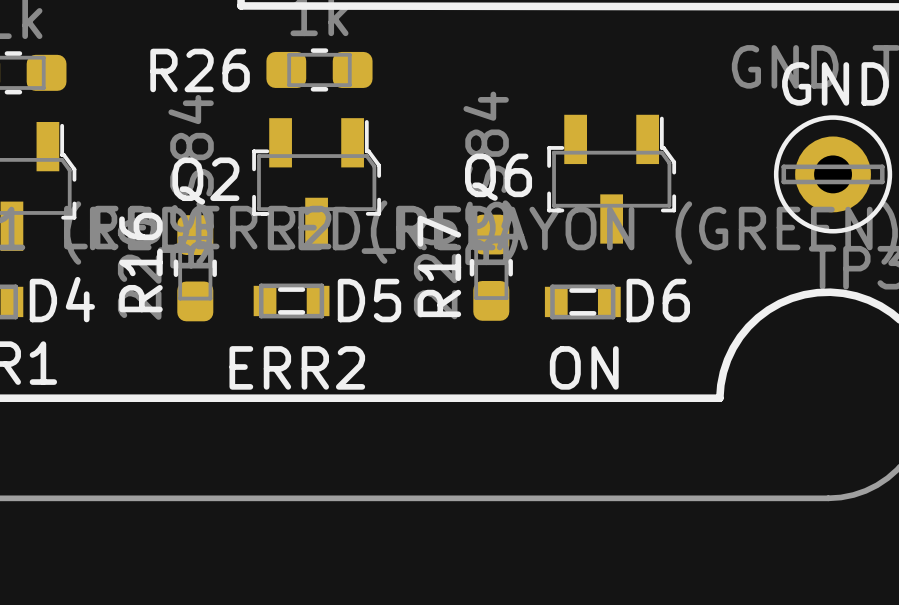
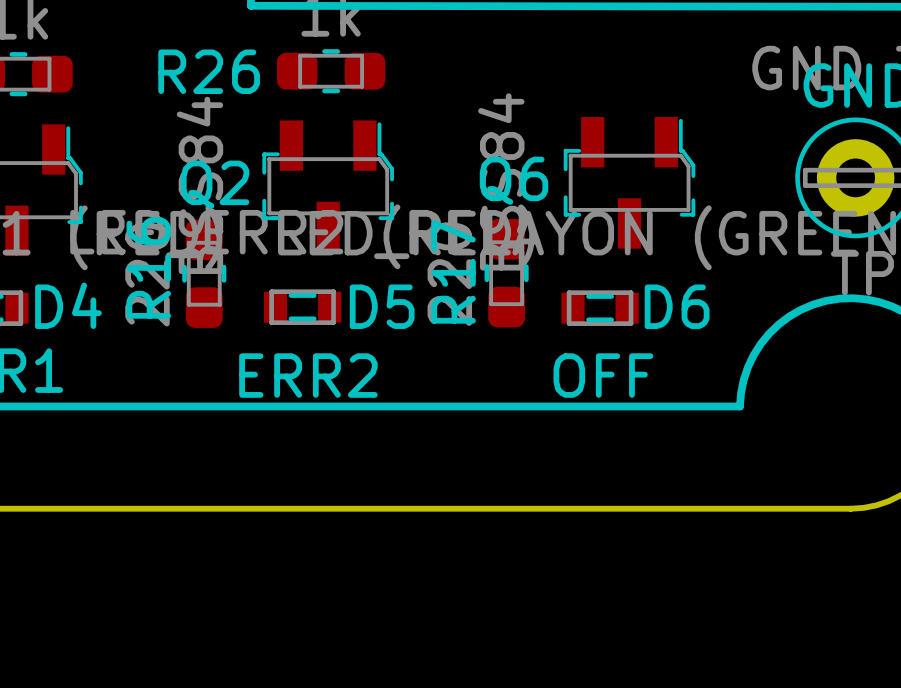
text: ON (584, 367) -> OFF (603, 375)

